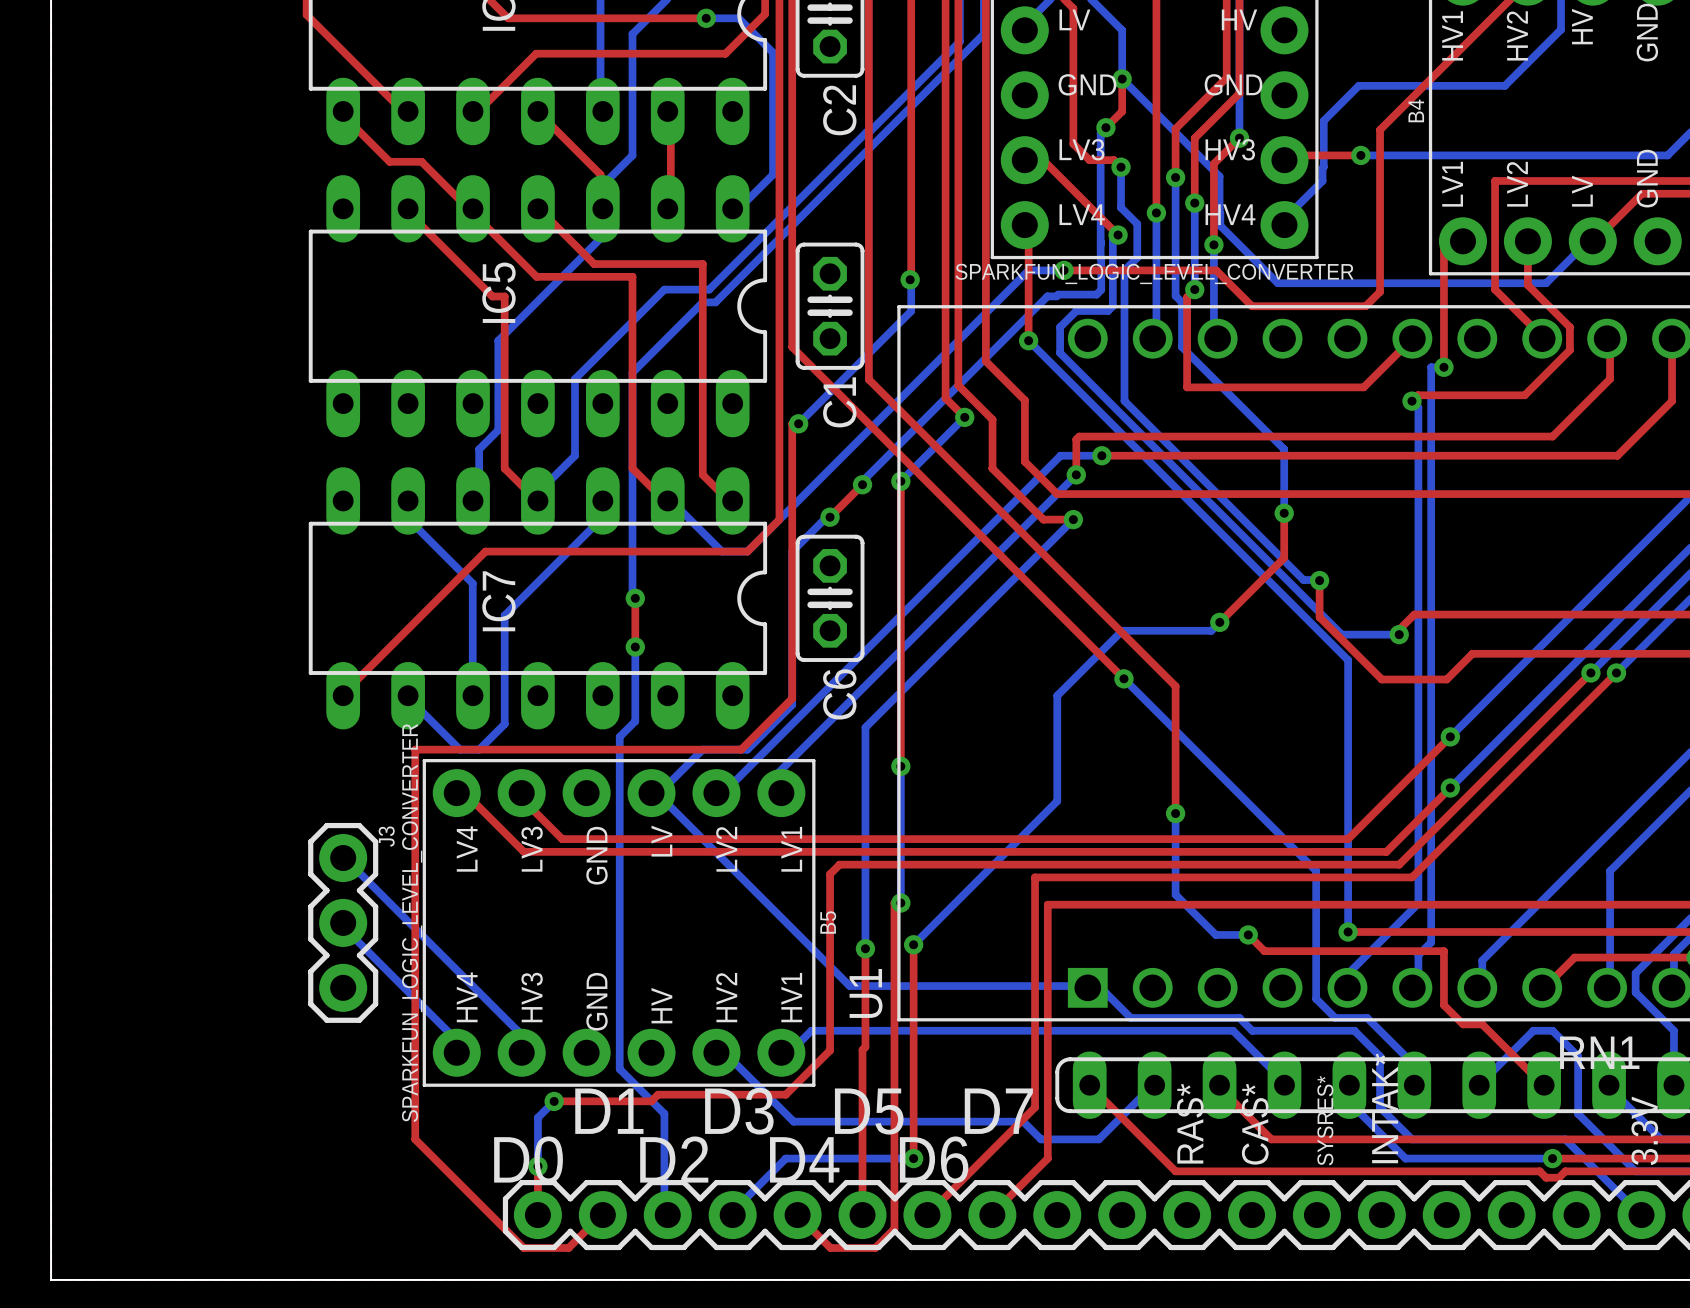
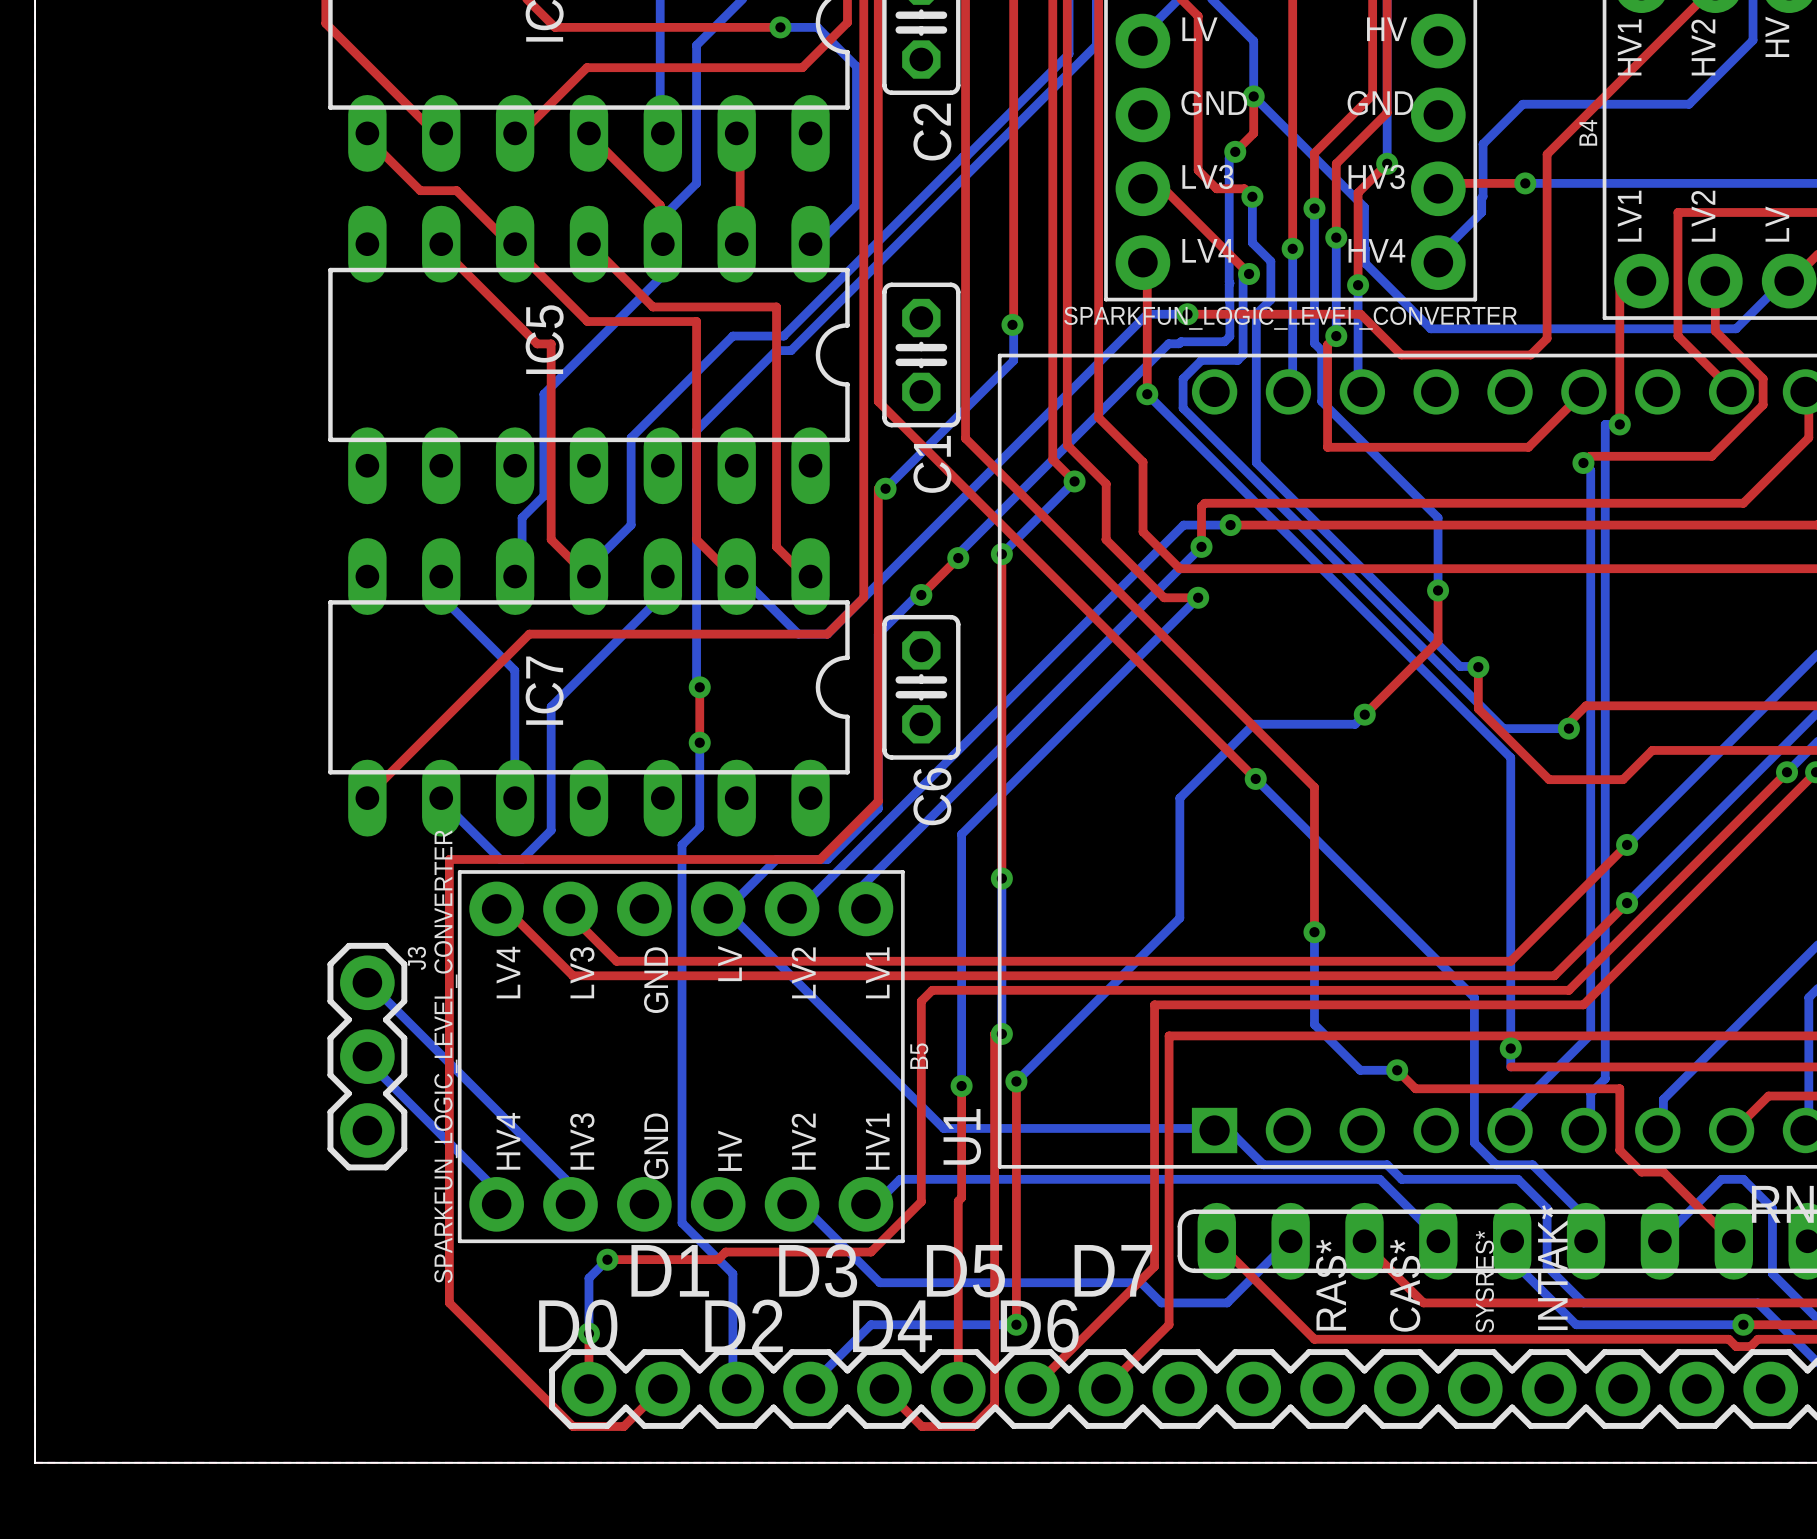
via position: (1348, 932) -> (1510, 1048)

